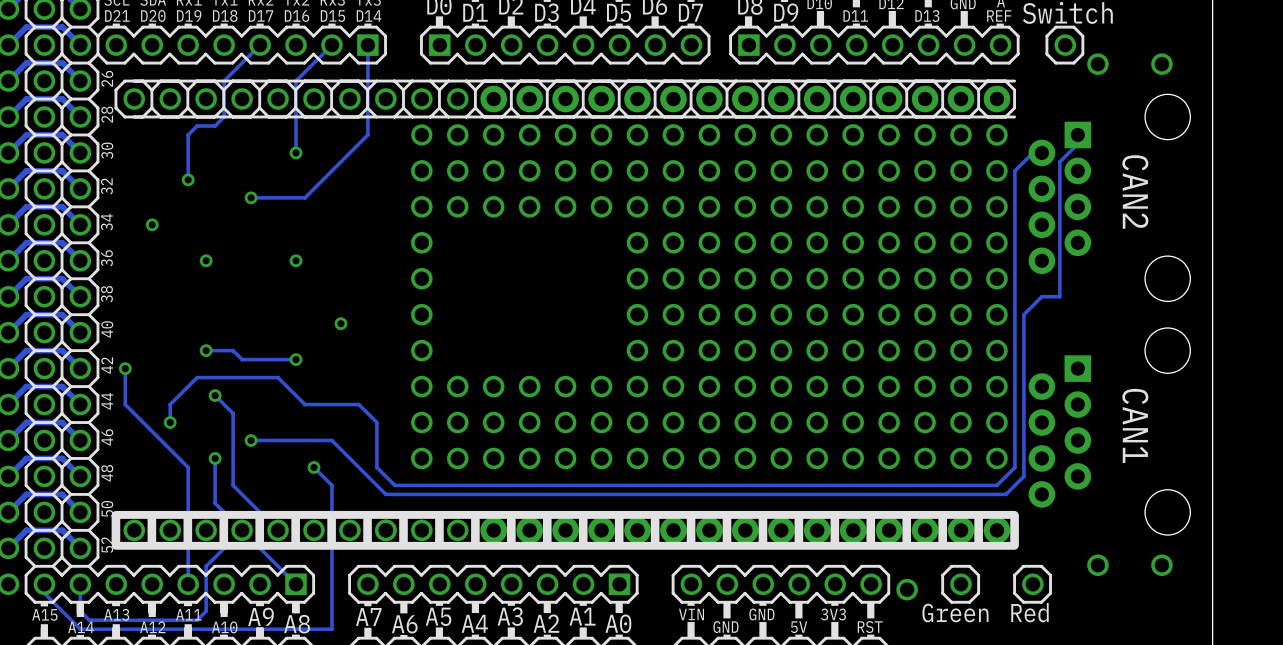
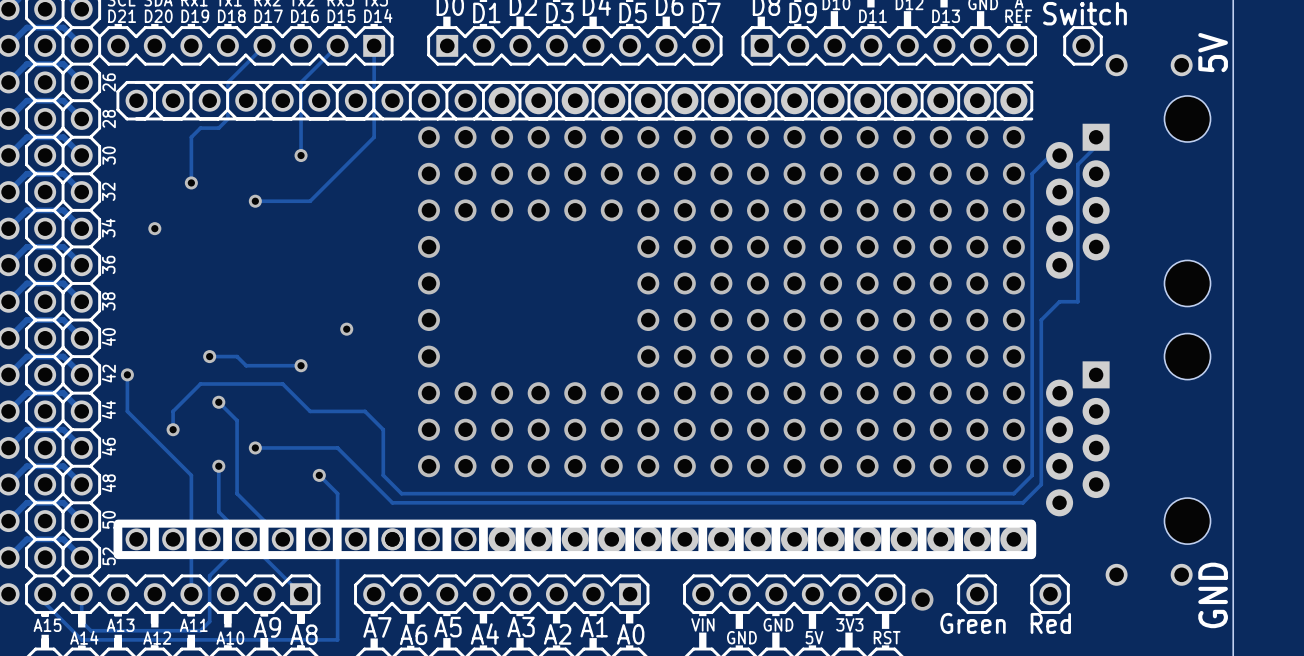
text: none -> 5V (1213, 52)
text: CAN2 (1135, 191) -> none
via: (206, 260) -> none
via: (296, 260) -> none
text: CAN1 (1135, 425) -> none
text: none -> GND (1213, 595)

